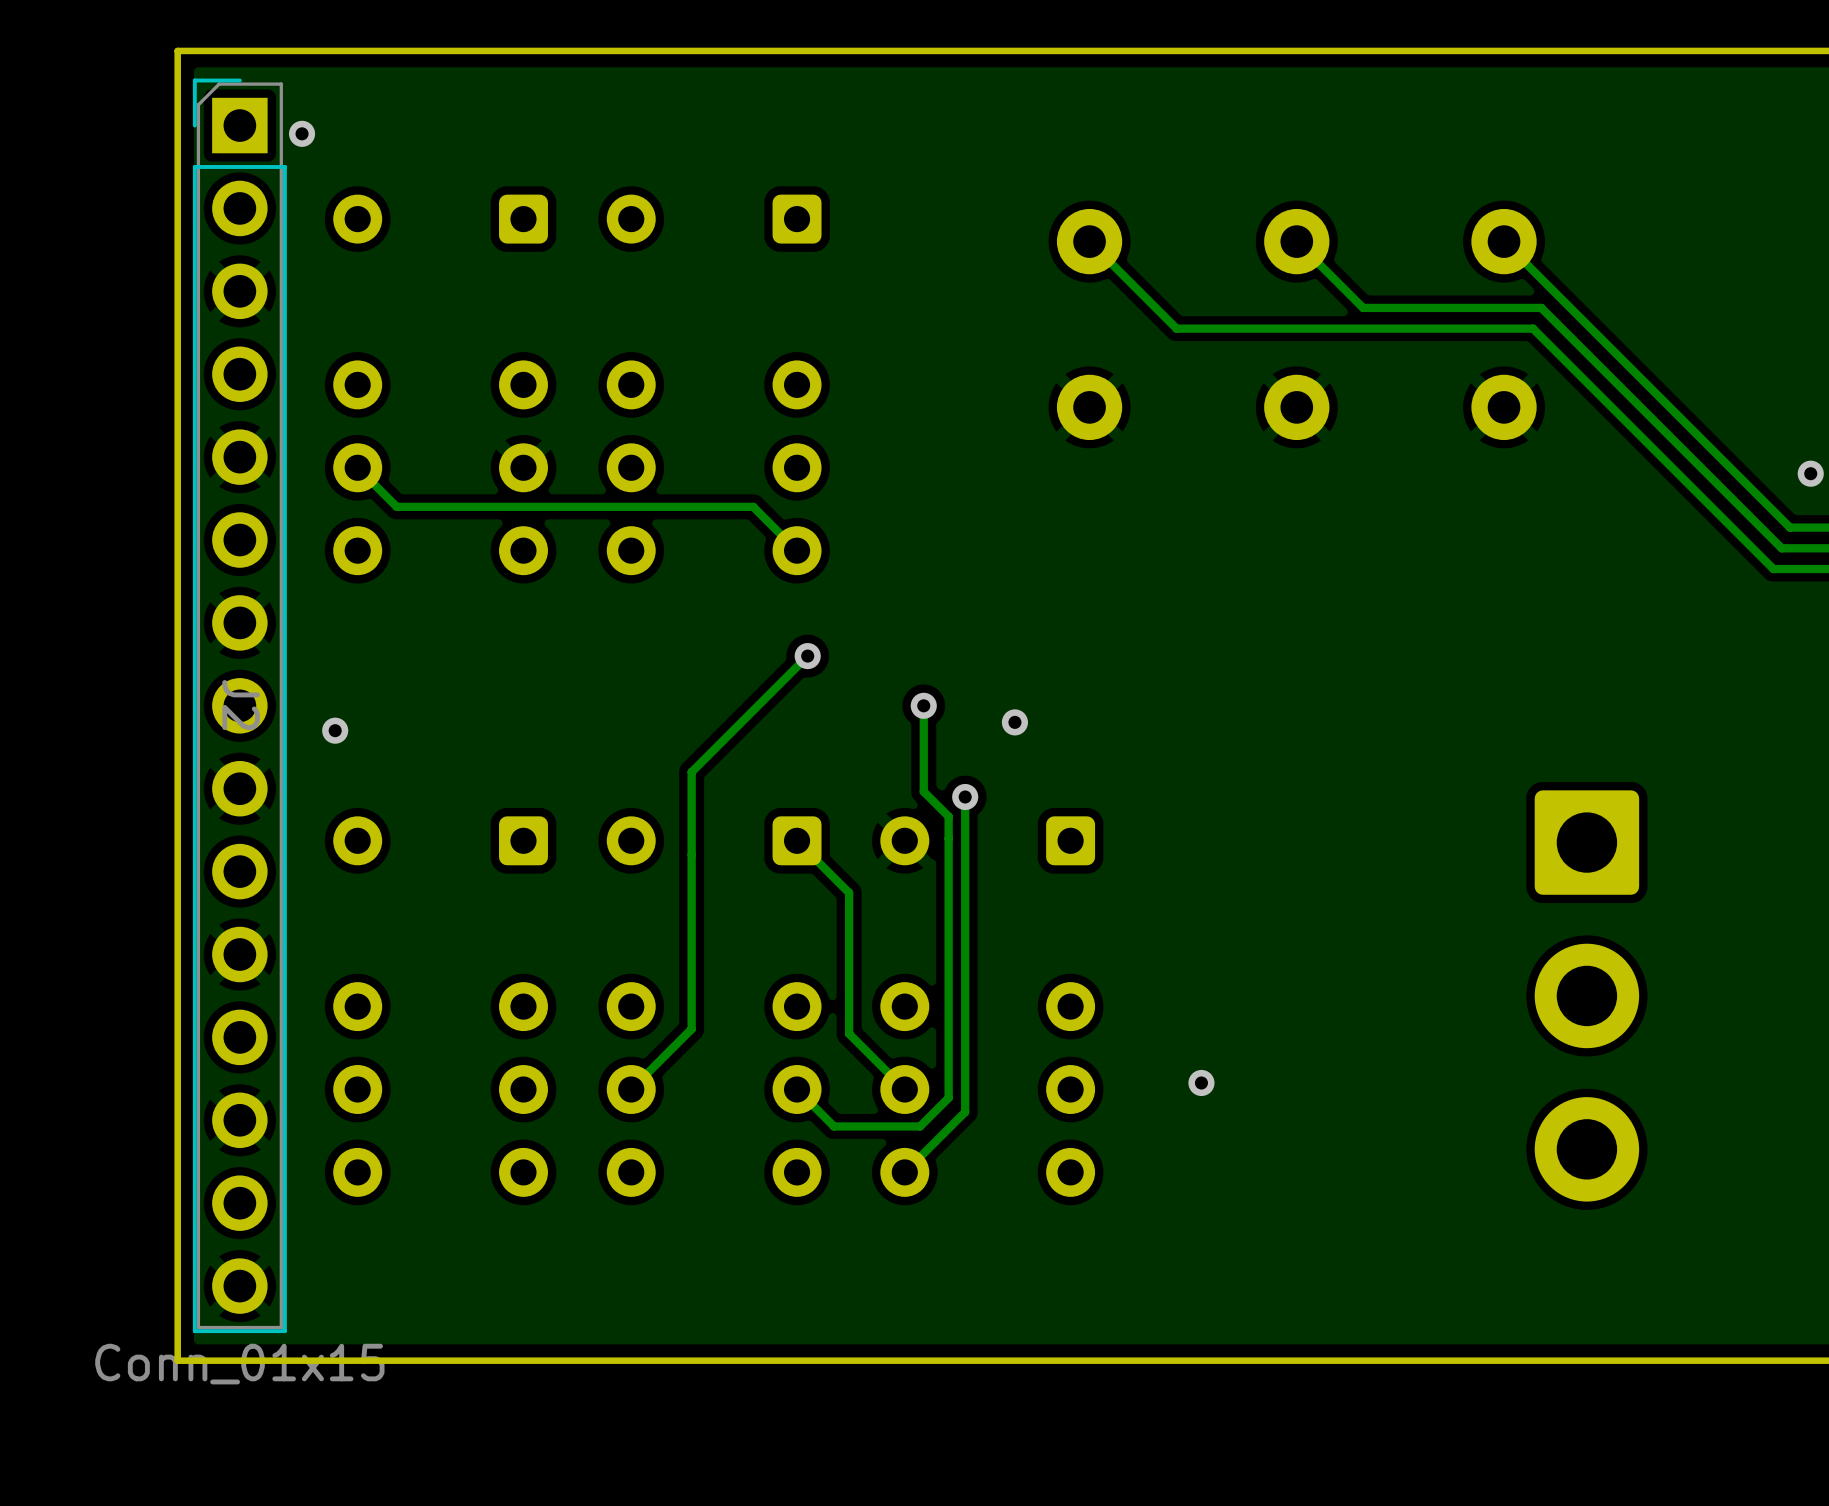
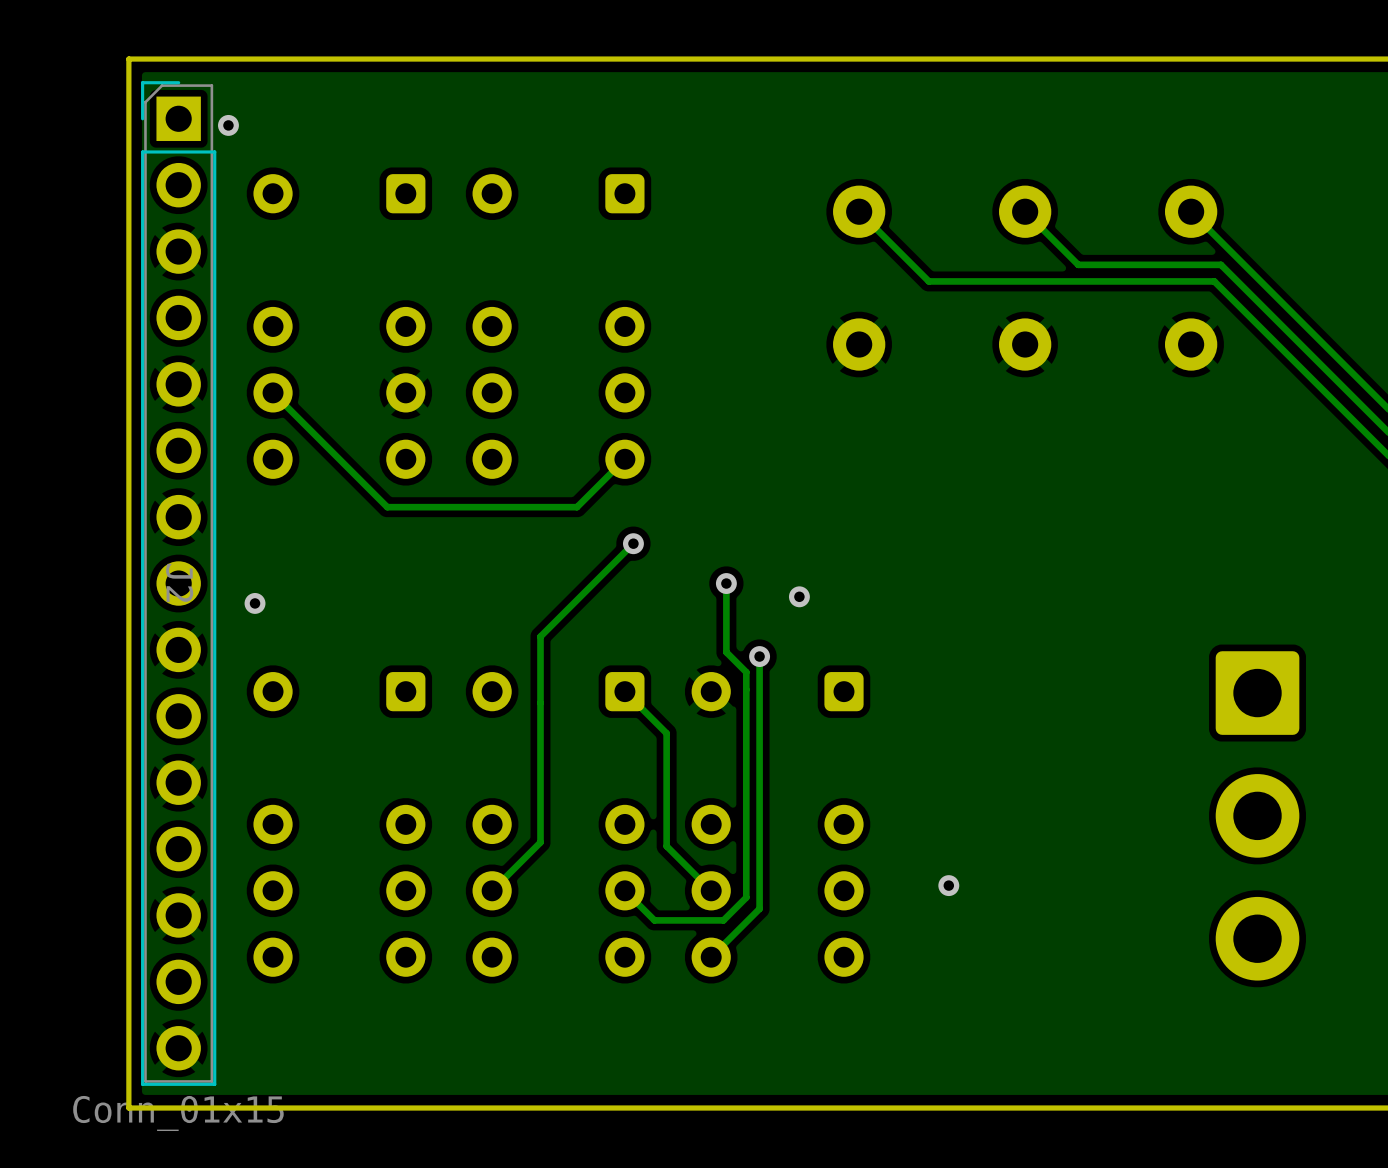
track: (396, 506) (753, 506) (797, 550) -> (304, 424) (387, 507) (577, 507) (624, 459)

